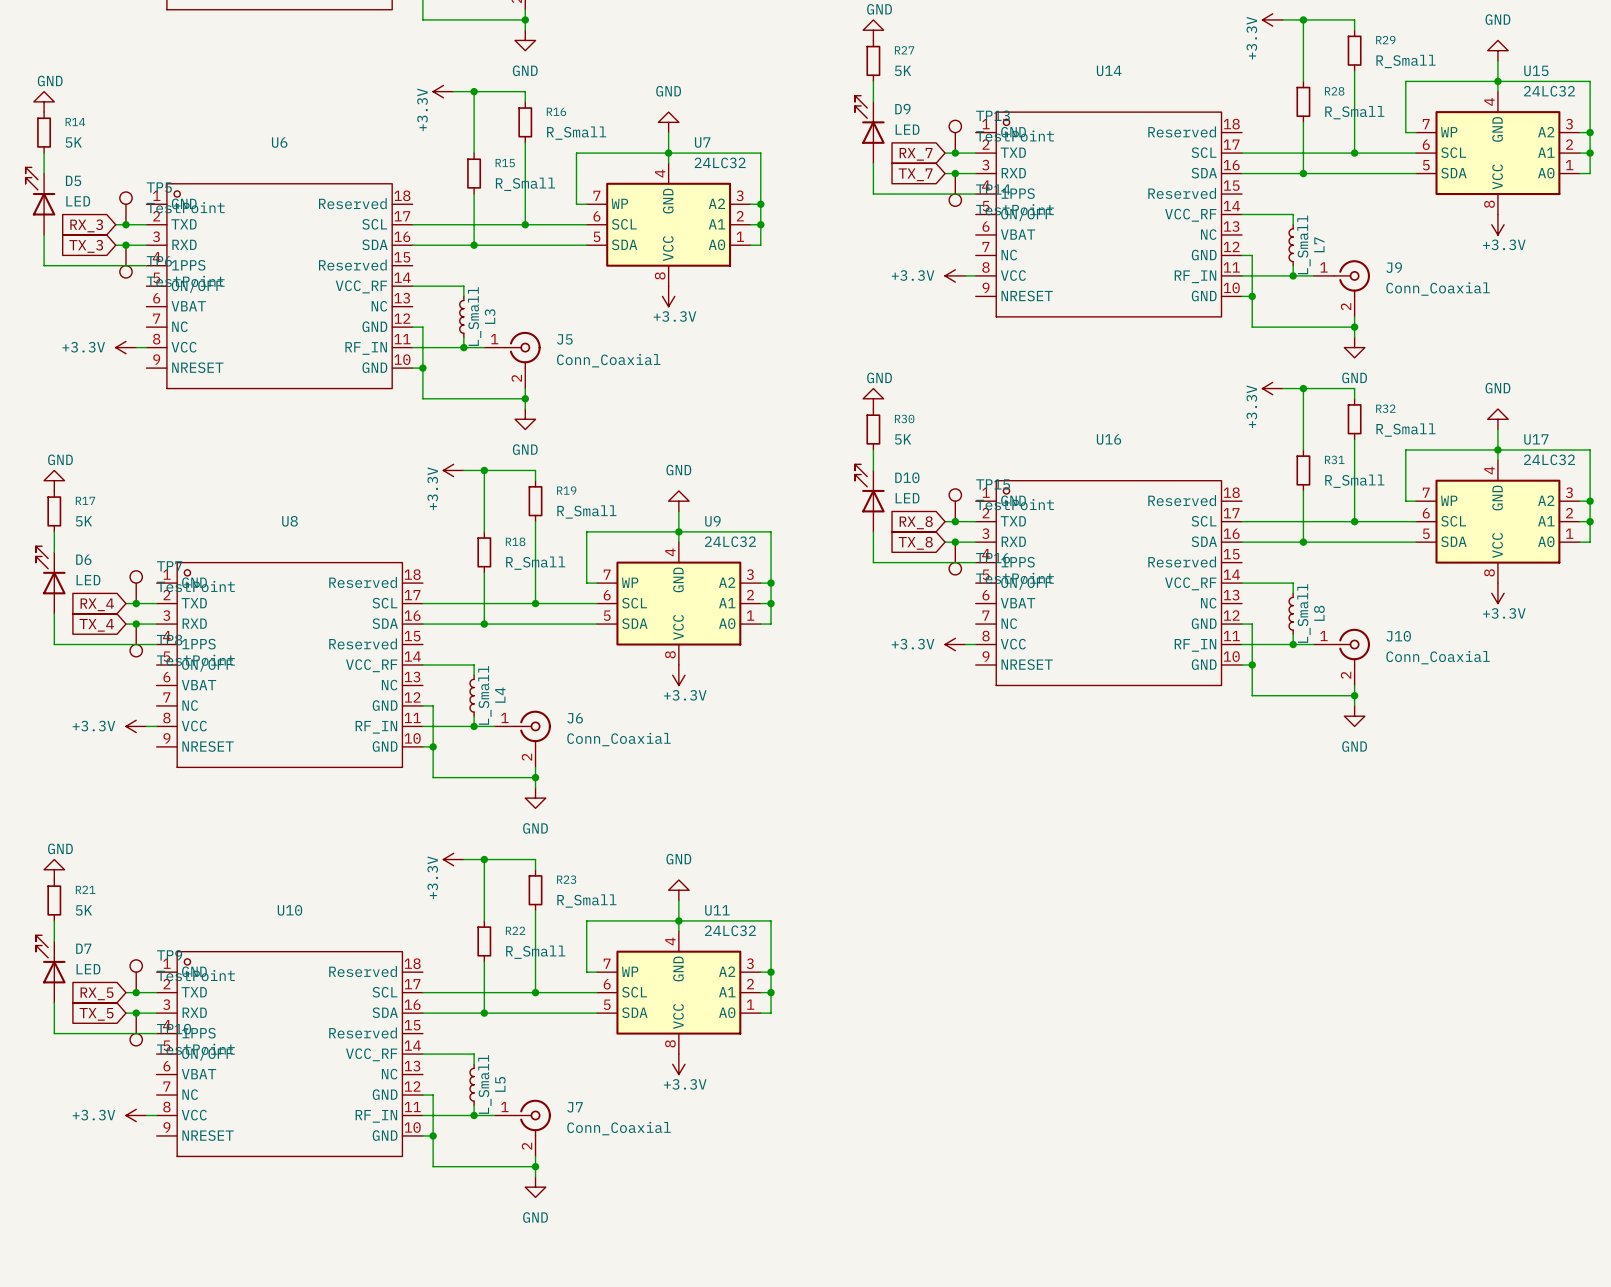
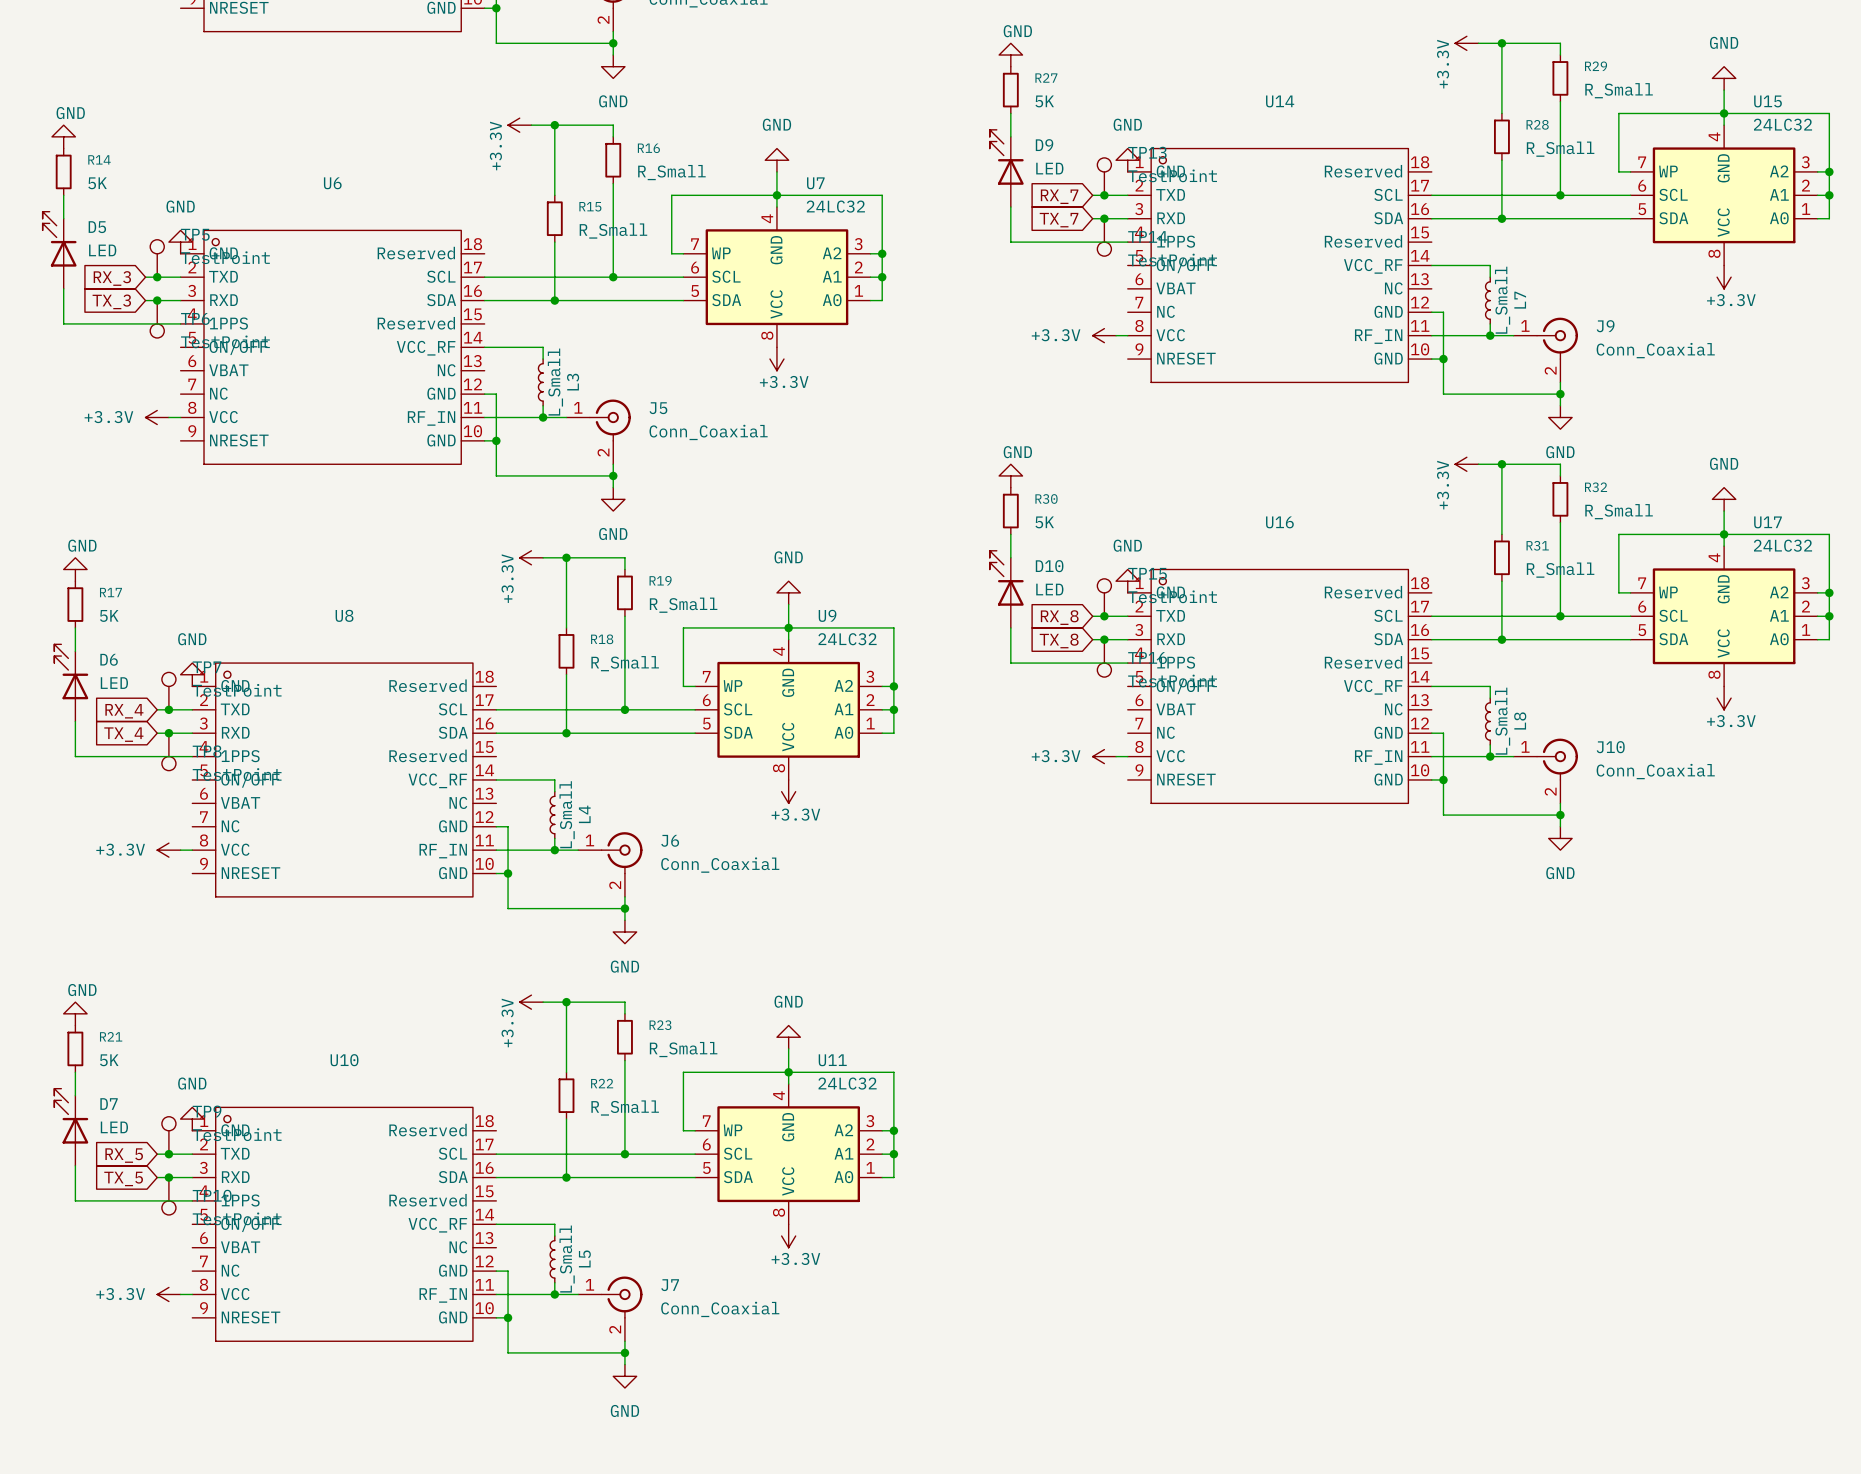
power symbol: none -> GND (1127, 160)
power symbol: none -> GND (180, 242)
power symbol: none -> GND (1127, 581)
power symbol: none -> GND (192, 674)
power symbol: none -> GND (192, 1119)

